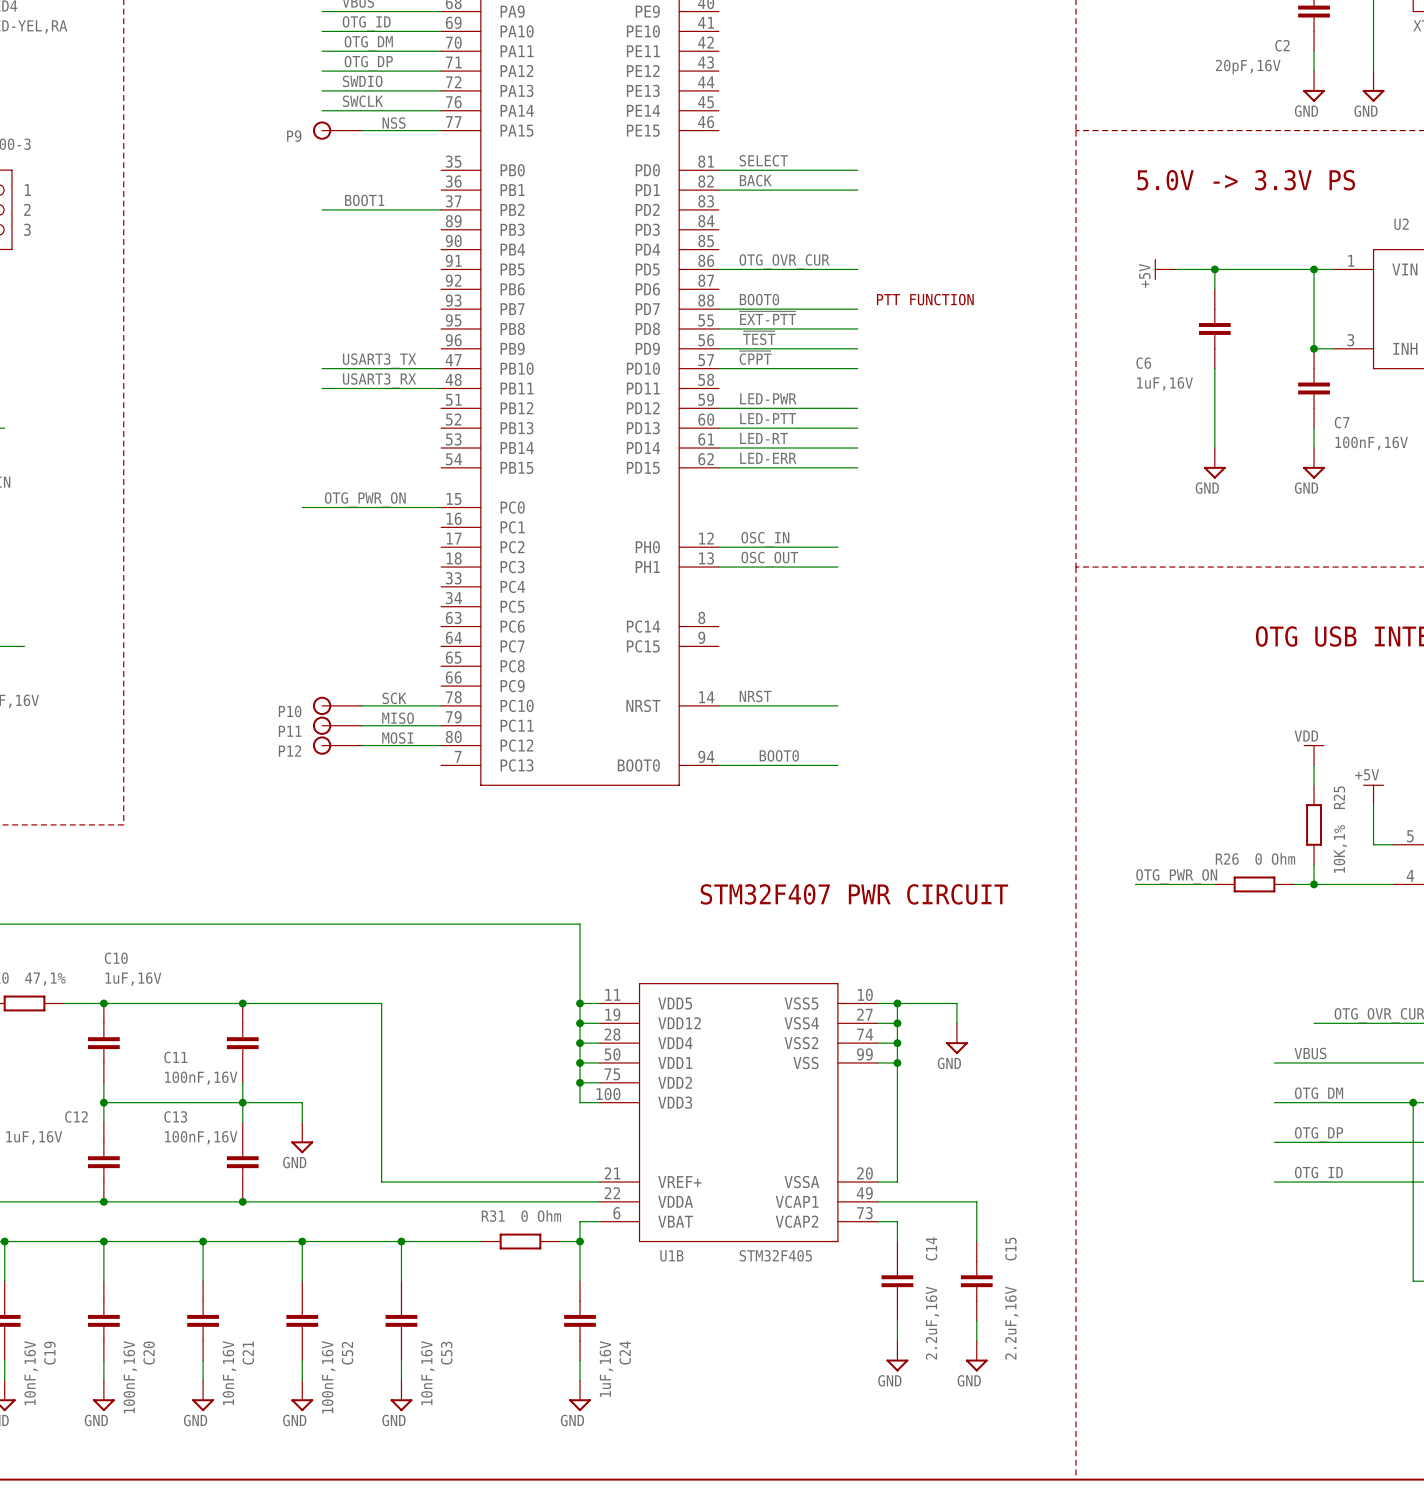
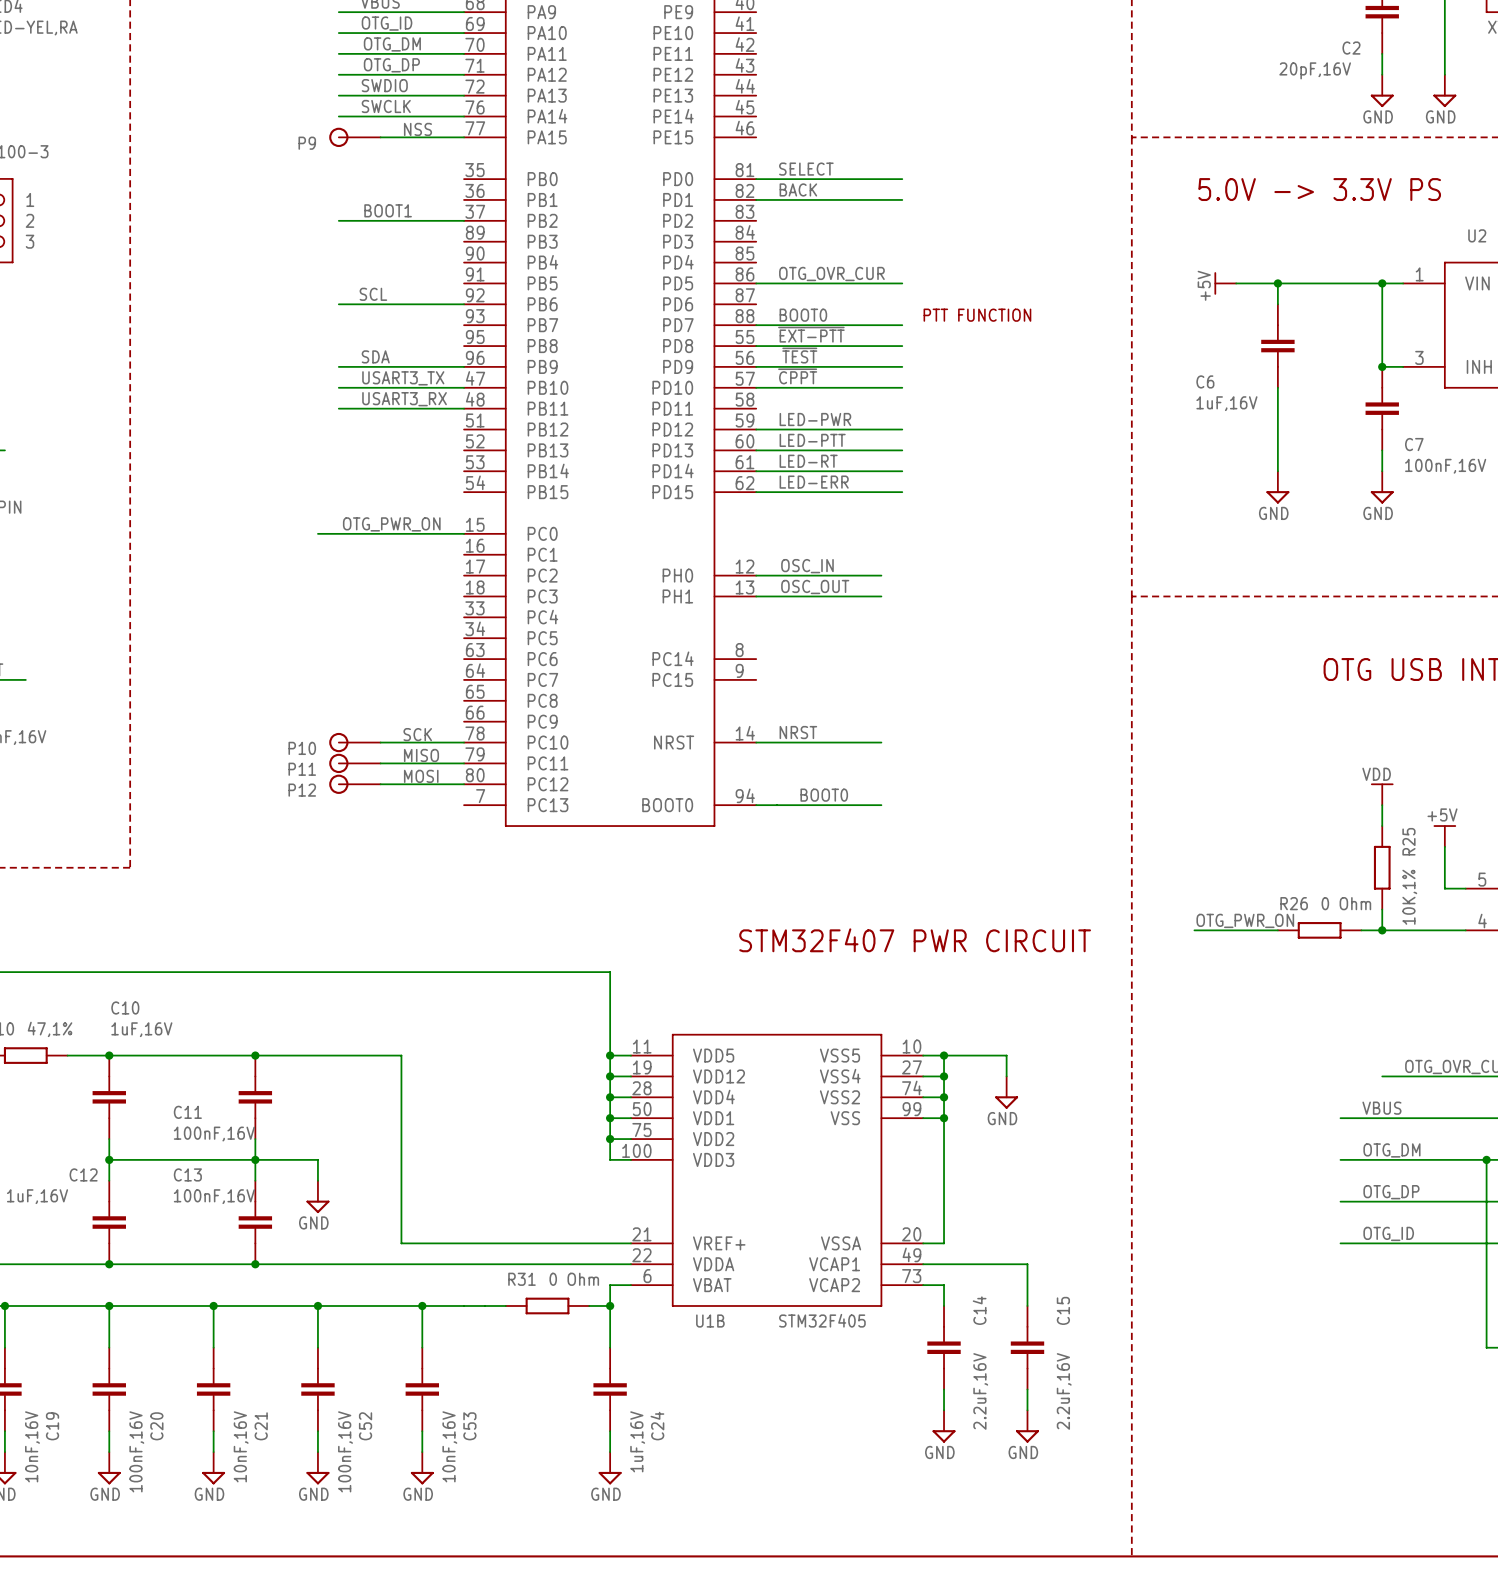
label: none -> SCL (373, 294)
wire: none -> (338, 304) (464, 304)
label: none -> SDA (375, 356)
wire: none -> (338, 366) (464, 366)

